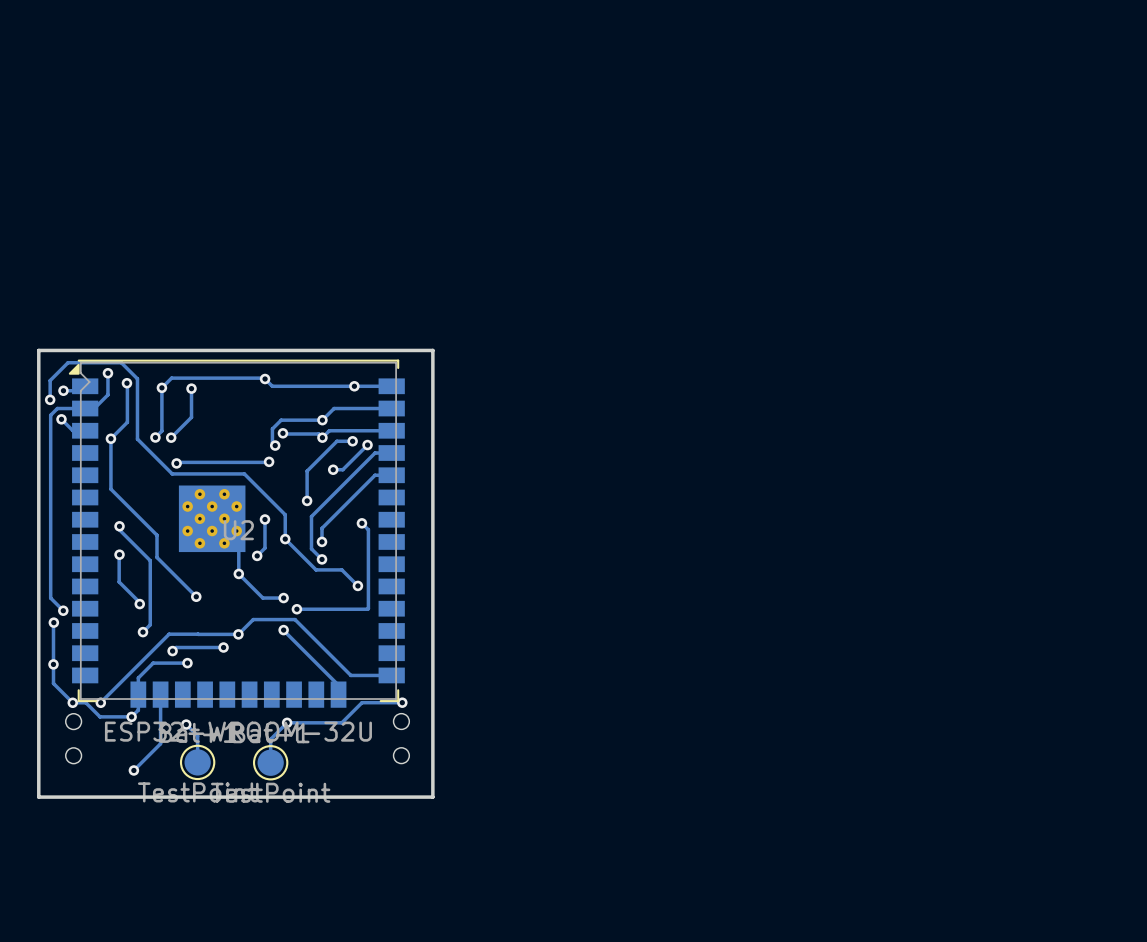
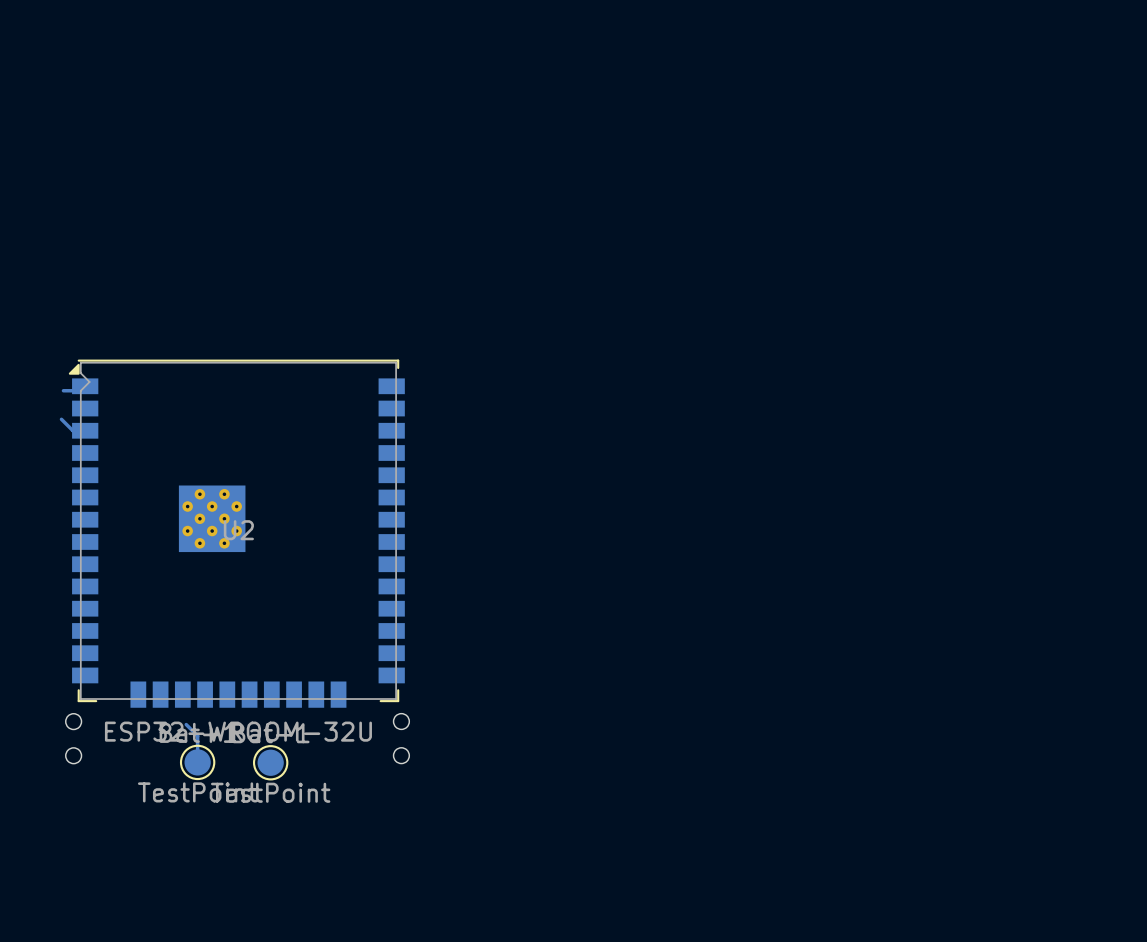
board edge: (432, 350) (38, 350) (38, 797) (432, 797) (432, 350) -> none
track: (107, 373) (107, 394) (94, 407) (57, 408) (50, 415) (50, 598) (63, 610) -> none
via: (107, 373) -> none
via: (265, 379) -> none
track: (126, 383) (127, 422) (110, 438) (110, 489) (157, 535) (157, 557) (196, 596) -> none
via: (126, 383) -> none
via: (354, 386) -> none
track: (391, 386) (272, 386) (264, 378) (171, 378) (161, 387) (161, 431) (155, 437) -> none
via: (161, 387) -> none
track: (191, 388) (191, 417) (171, 437) -> none
via: (191, 388) -> none
via: (63, 390) -> none
track: (50, 399) (50, 380) (68, 362) (121, 362) (137, 378) (137, 439) (172, 473) (244, 473) (285, 514) (285, 539) (316, 569) (341, 569) (357, 585) -> none
via: (50, 399) -> none
track: (391, 408) (334, 408) (322, 420) (281, 420) (272, 428) (272, 442) (275, 445) -> none
via: (61, 419) -> none
via: (322, 420) -> none
track: (391, 430) (329, 430) (322, 437) (318, 434) (282, 433) -> none
via: (282, 433) -> none
via: (155, 437) -> none
via: (171, 437) -> none
via: (322, 437) -> none
via: (110, 438) -> none
track: (352, 441) (336, 441) (307, 471) (307, 500) -> none
via: (352, 441) -> none
via: (275, 445) -> none
track: (367, 445) (342, 469) (333, 469) -> none
via: (367, 445) -> none
track: (391, 453) (375, 453) (311, 516) (311, 548) (322, 559) -> none
track: (269, 461) (176, 463) -> none
via: (269, 461) -> none
via: (176, 463) -> none
via: (333, 469) -> none
track: (391, 475) (375, 475) (322, 528) (322, 541) -> none
via: (307, 500) -> none
track: (264, 519) (264, 548) (257, 555) -> none
via: (264, 519) -> none
track: (361, 523) (368, 529) (368, 608) (296, 609) -> none
via: (361, 523) -> none
track: (119, 526) (119, 529) (150, 560) (150, 624) (142, 632) -> none
via: (119, 526) -> none
via: (285, 539) -> none
via: (322, 541) -> none
track: (236, 543) (238, 545) (238, 573) (262, 598) (283, 598) -> none
track: (119, 554) (119, 582) (139, 604) -> none
via: (119, 554) -> none
via: (257, 555) -> none
via: (322, 559) -> none
via: (238, 573) -> none
via: (357, 585) -> none
via: (196, 596) -> none
via: (283, 598) -> none
via: (139, 604) -> none
via: (296, 609) -> none
via: (63, 610) -> none
track: (53, 622) (53, 683) (72, 702) (85, 702) (100, 716) (131, 716) (138, 710) (138, 677) (153, 663) (187, 663) -> none
via: (53, 622) -> none
track: (283, 630) (338, 685) (338, 694) -> none
via: (283, 630) -> none
via: (142, 632) -> none
track: (197, 634) (169, 634) (100, 702) -> none
track: (198, 634) (238, 634) (253, 619) (295, 619) (350, 675) (391, 675) -> none
via: (238, 634) -> none
track: (223, 647) (176, 647) (172, 651) -> none
via: (223, 647) -> none
via: (172, 651) -> none
via: (187, 663) -> none
via: (53, 664) -> none
track: (160, 694) (160, 743) (133, 770) -> none
via: (72, 702) -> none
via: (100, 702) -> none
track: (402, 702) (362, 702) (341, 722) (287, 722) (270, 739) (270, 762) -> none
via: (402, 702) -> none
via: (131, 716) -> none
via: (287, 722) -> none
via: (186, 724) -> none
via: (133, 770) -> none

